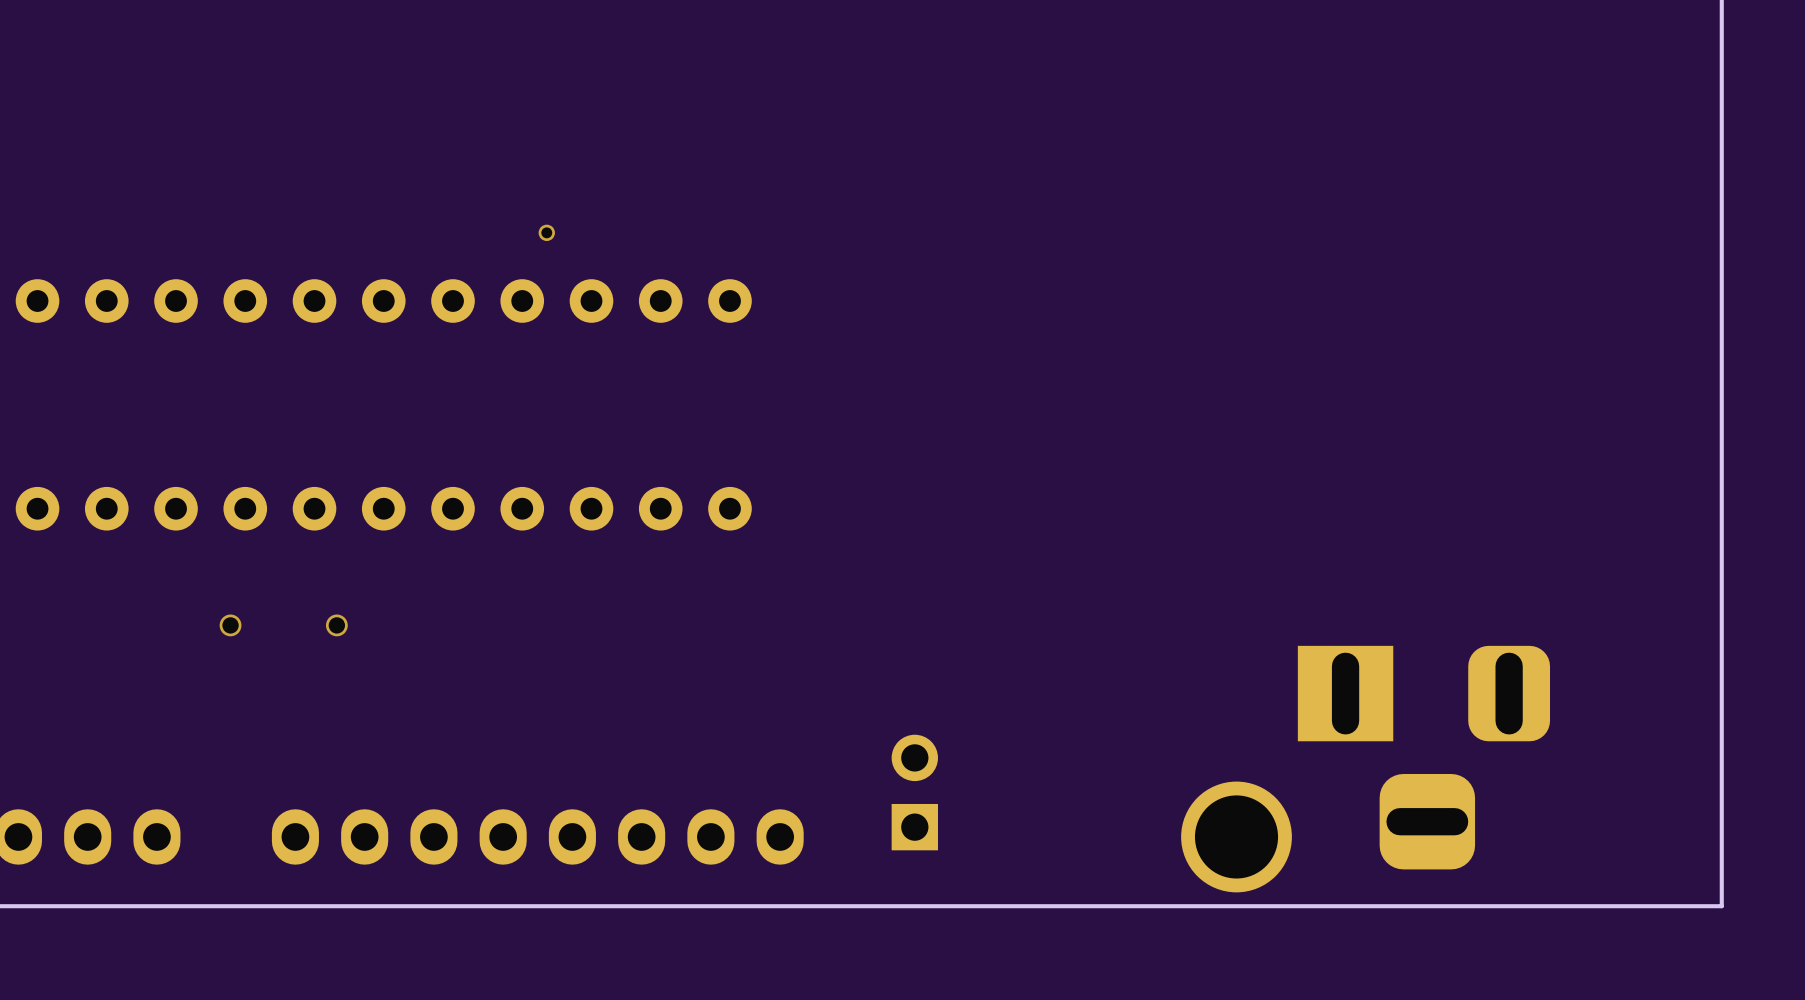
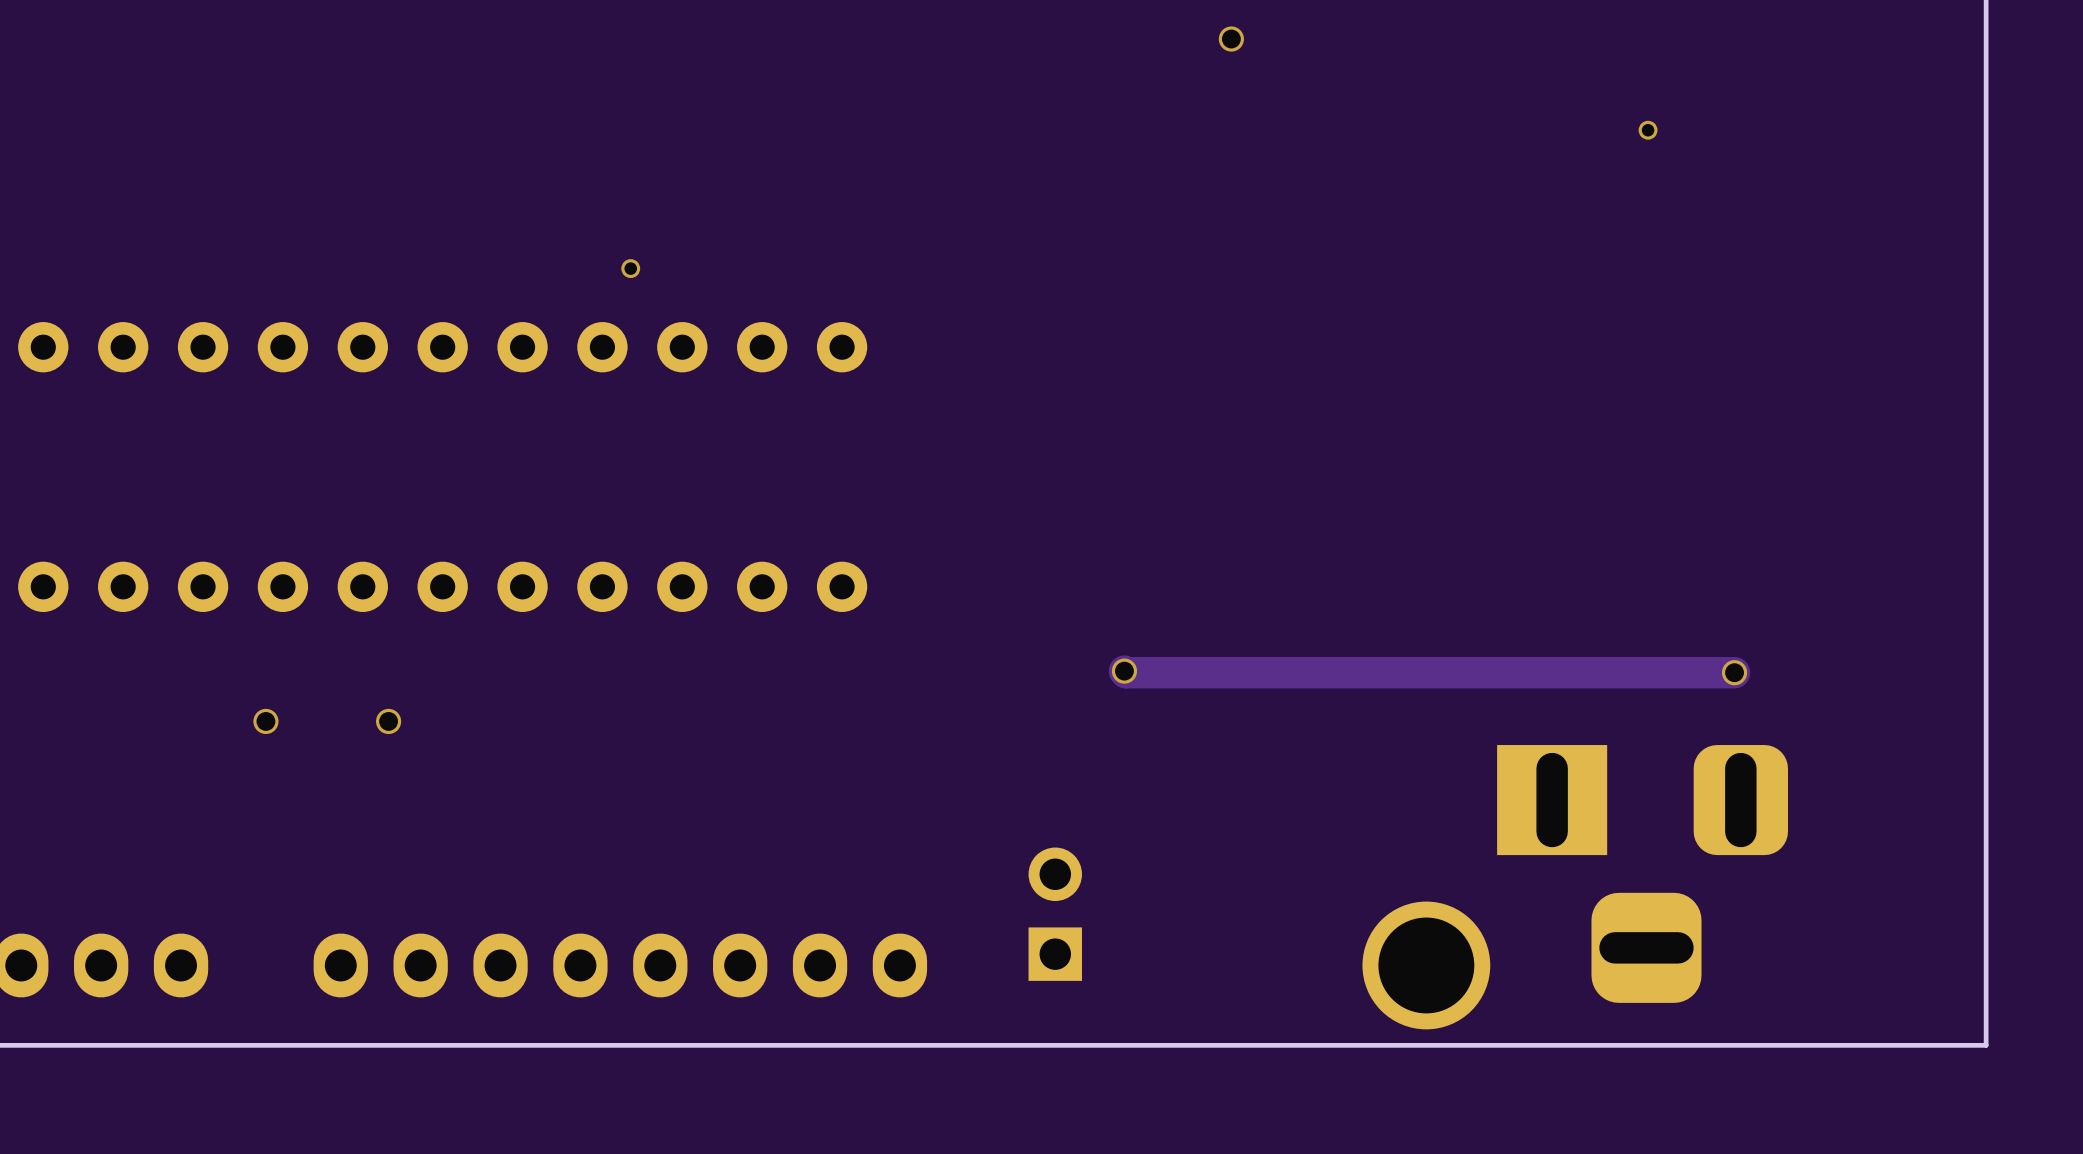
via: none -> (1231, 39)
via: none -> (1648, 130)
track: none -> (1124, 671) (1126, 672) (1734, 672)
via: none -> (1124, 671)
via: none -> (1734, 672)

